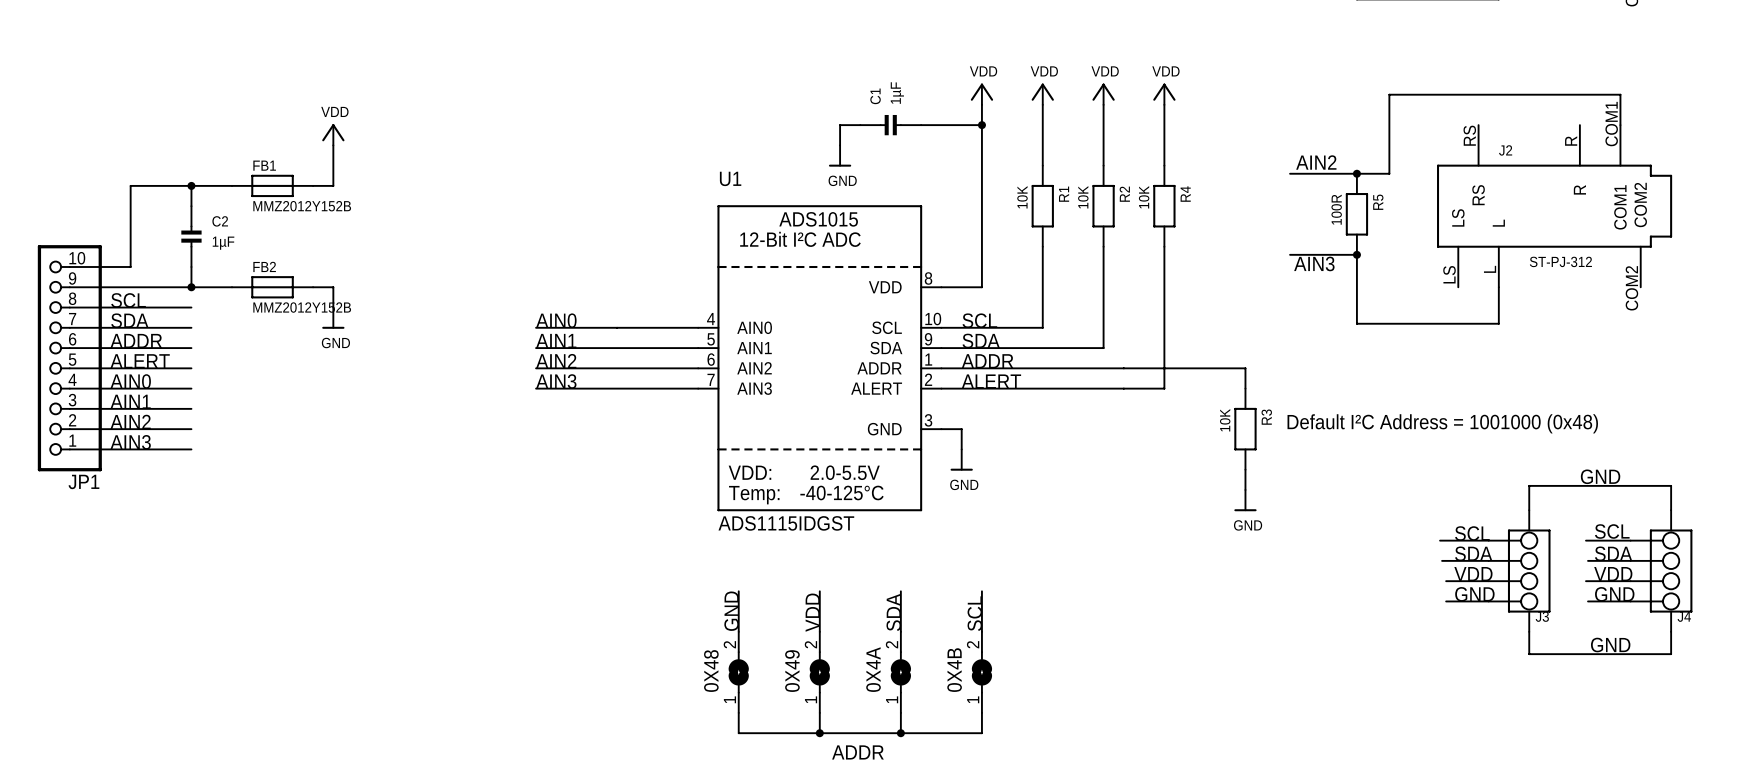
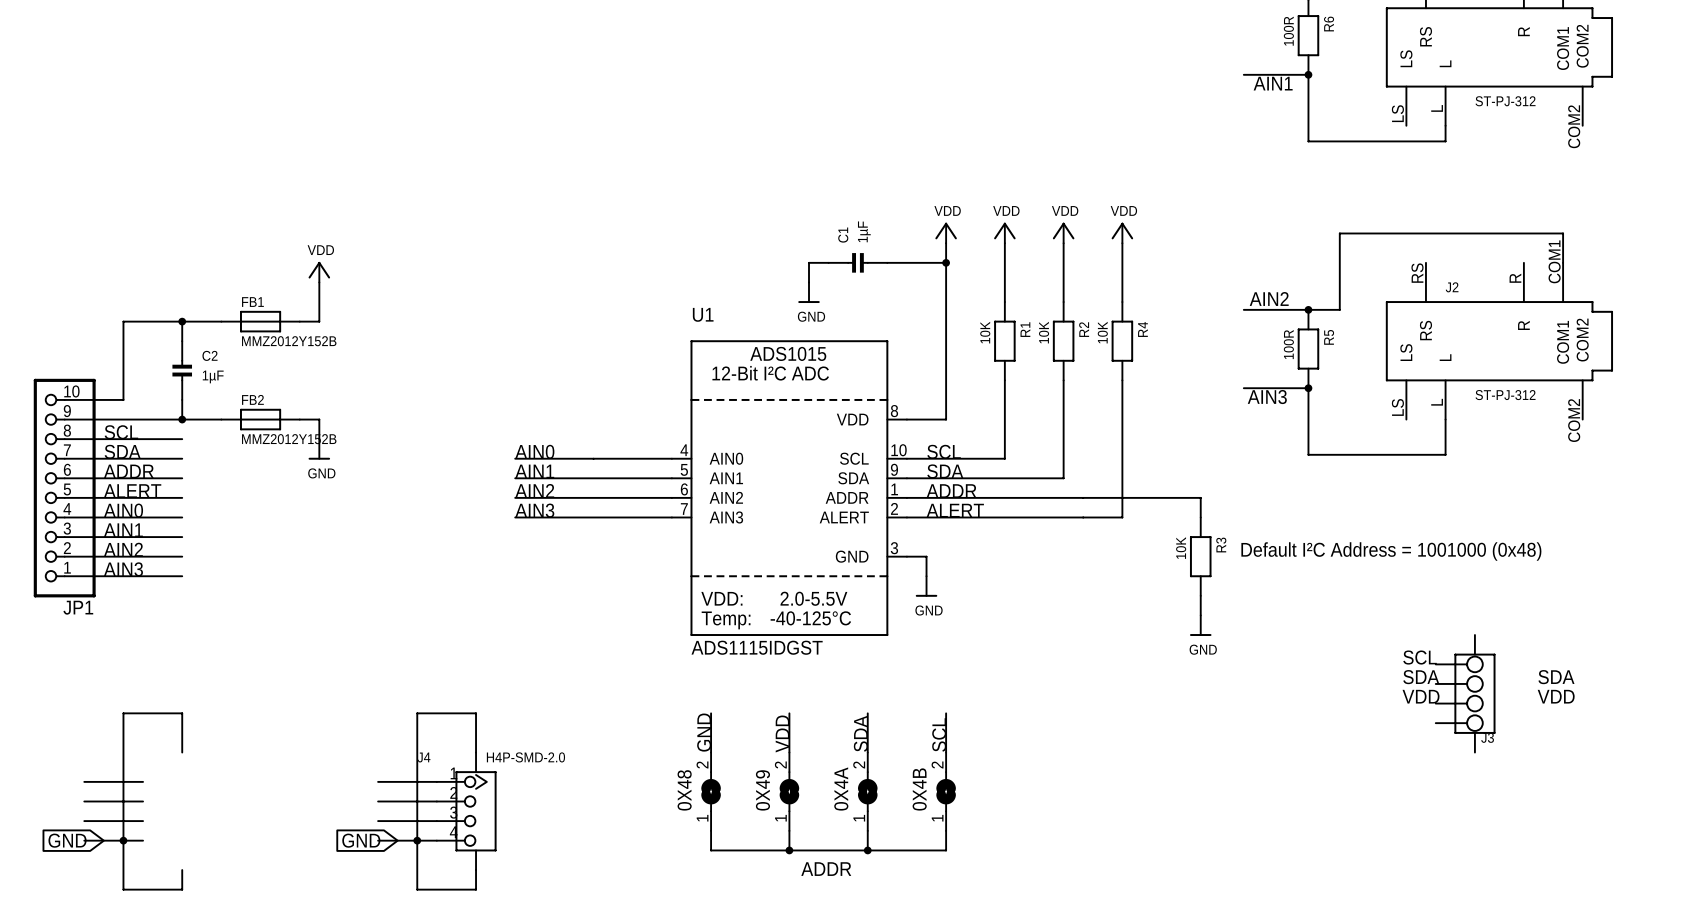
label: GND (1600, 476) -> none
wire: (1529, 510) (1529, 485) (1671, 485) (1671, 510) -> none
J4 symbol: [1630, 510, 1693, 632] -> [436, 752, 497, 871]
label: SCL (1612, 531) -> none
wire: (1440, 540) (1488, 540) -> none
wire: (1585, 540) (1630, 540) -> none
wire: (1442, 560) (1488, 560) -> none
wire: (1588, 560) (1630, 560) -> none
wire: (1446, 581) (1488, 581) -> none
wire: (1585, 581) (1630, 581) -> none
label: GND (1474, 594) -> none
label: GND (1614, 594) -> none
wire: (1446, 601) (1488, 601) -> none
wire: (1588, 601) (1630, 601) -> none
J4 name position: J4 (1684, 616) -> J4 (423, 757)
wire: none -> (182, 752) (182, 713) (123, 713) (123, 889) (182, 889) (182, 870)
wire: none -> (476, 752) (476, 713) (417, 713) (417, 889) (476, 889) (476, 870)
wire: (1529, 631) (1529, 654) (1671, 654) (1671, 631) -> none
J4 value: none -> H4P-SMD-2.0 (525, 757)
label: GND (1610, 645) -> none
wire: none -> (84, 781) (143, 781)
wire: none -> (378, 781) (436, 781)
wire: none -> (84, 801) (143, 801)
wire: none -> (378, 801) (436, 801)
wire: none -> (84, 821) (143, 821)
wire: none -> (378, 821) (436, 821)
global label: none -> GND (67, 840)
wire: none -> (84, 840) (143, 840)
junction: none -> (123, 840)
global label: none -> GND (361, 840)
wire: none -> (378, 840) (436, 840)
junction: none -> (417, 840)

